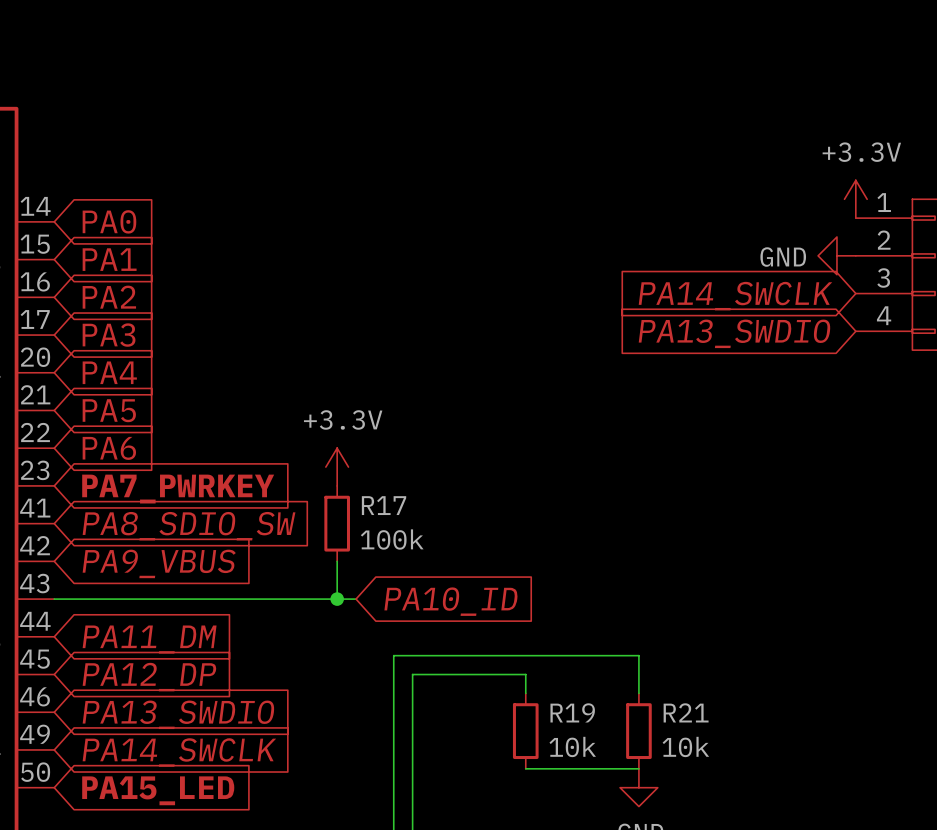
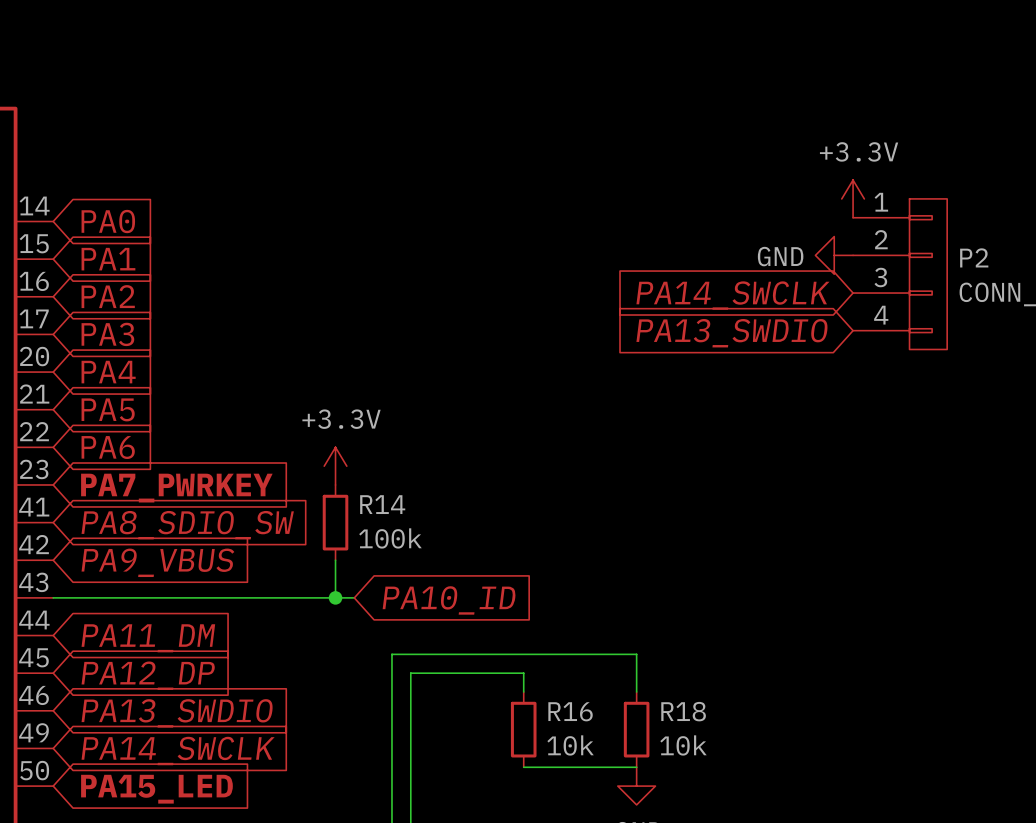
R17 name: R17 (384, 505) -> R14 (382, 504)
R19 name: R19 (572, 712) -> R16 (570, 711)
R21 name: R21 (686, 712) -> R18 (683, 711)

